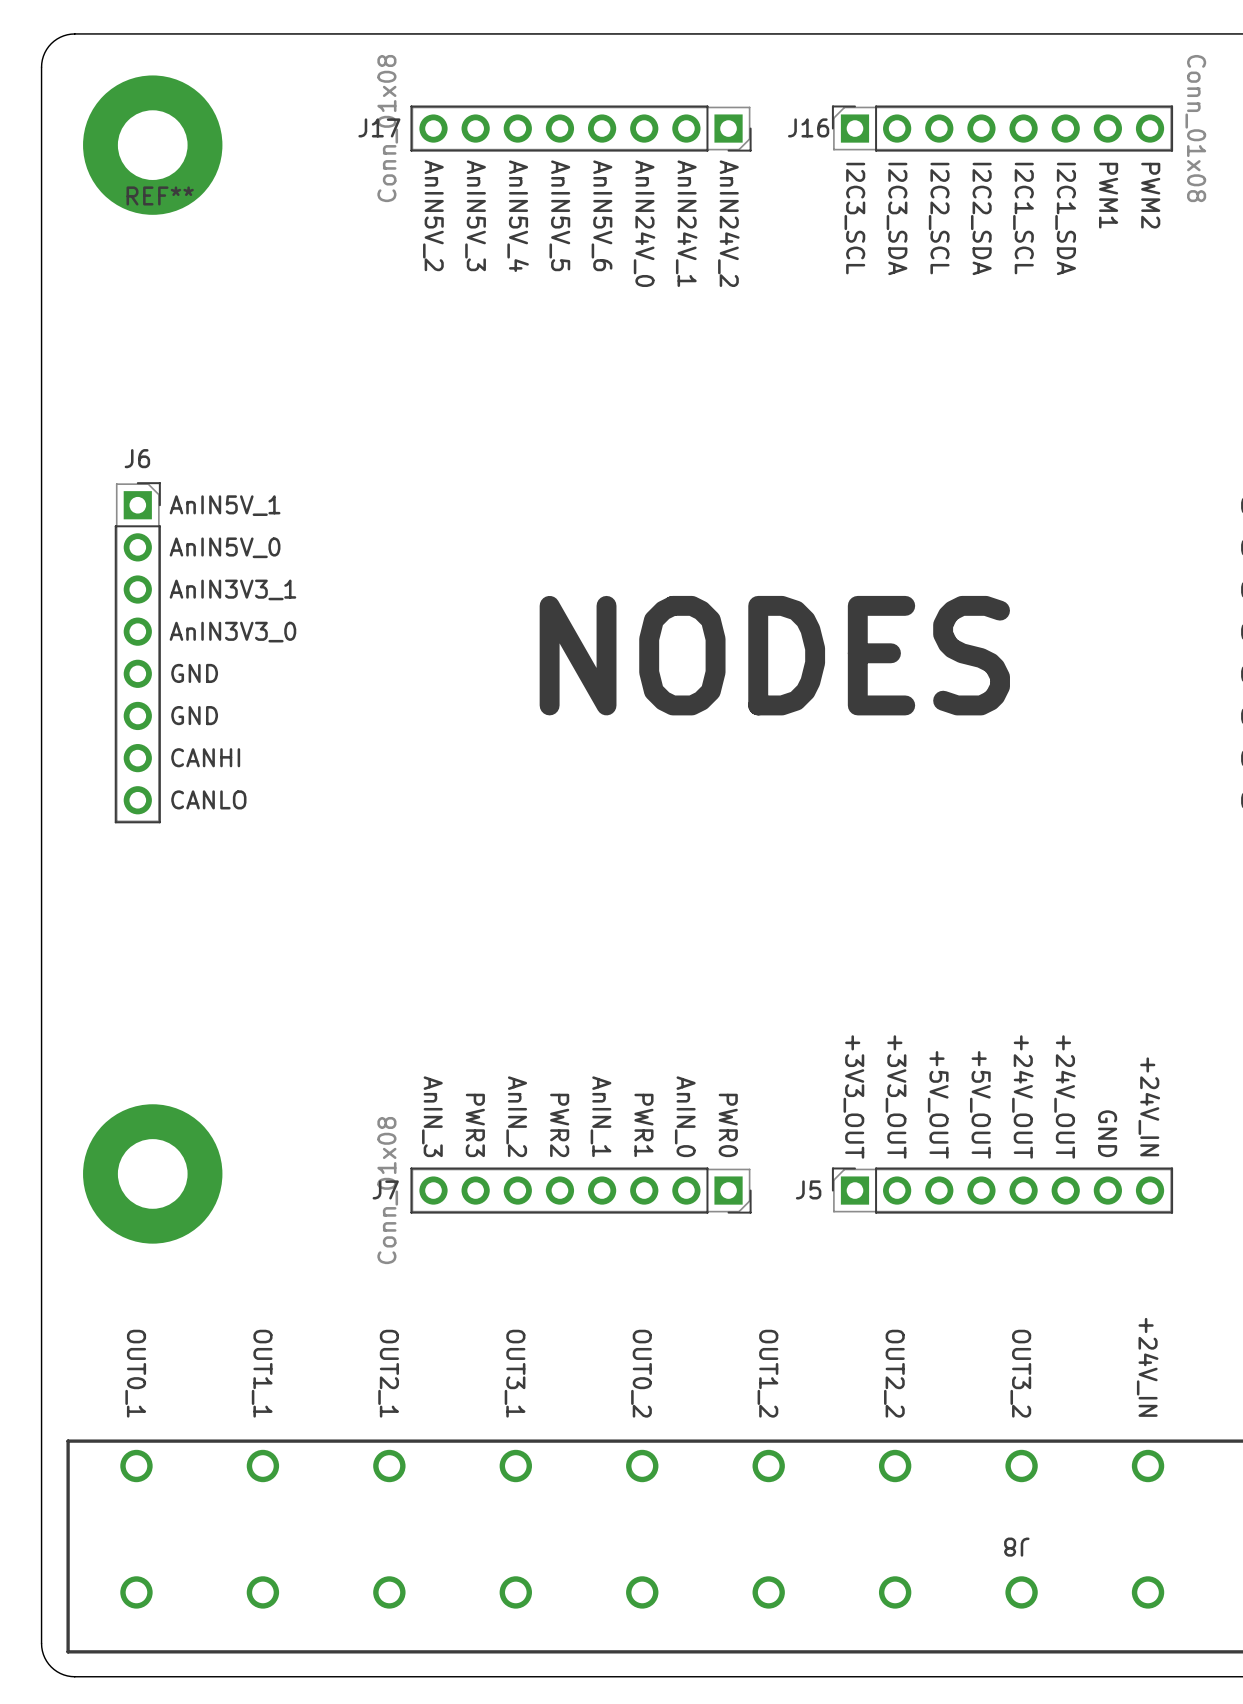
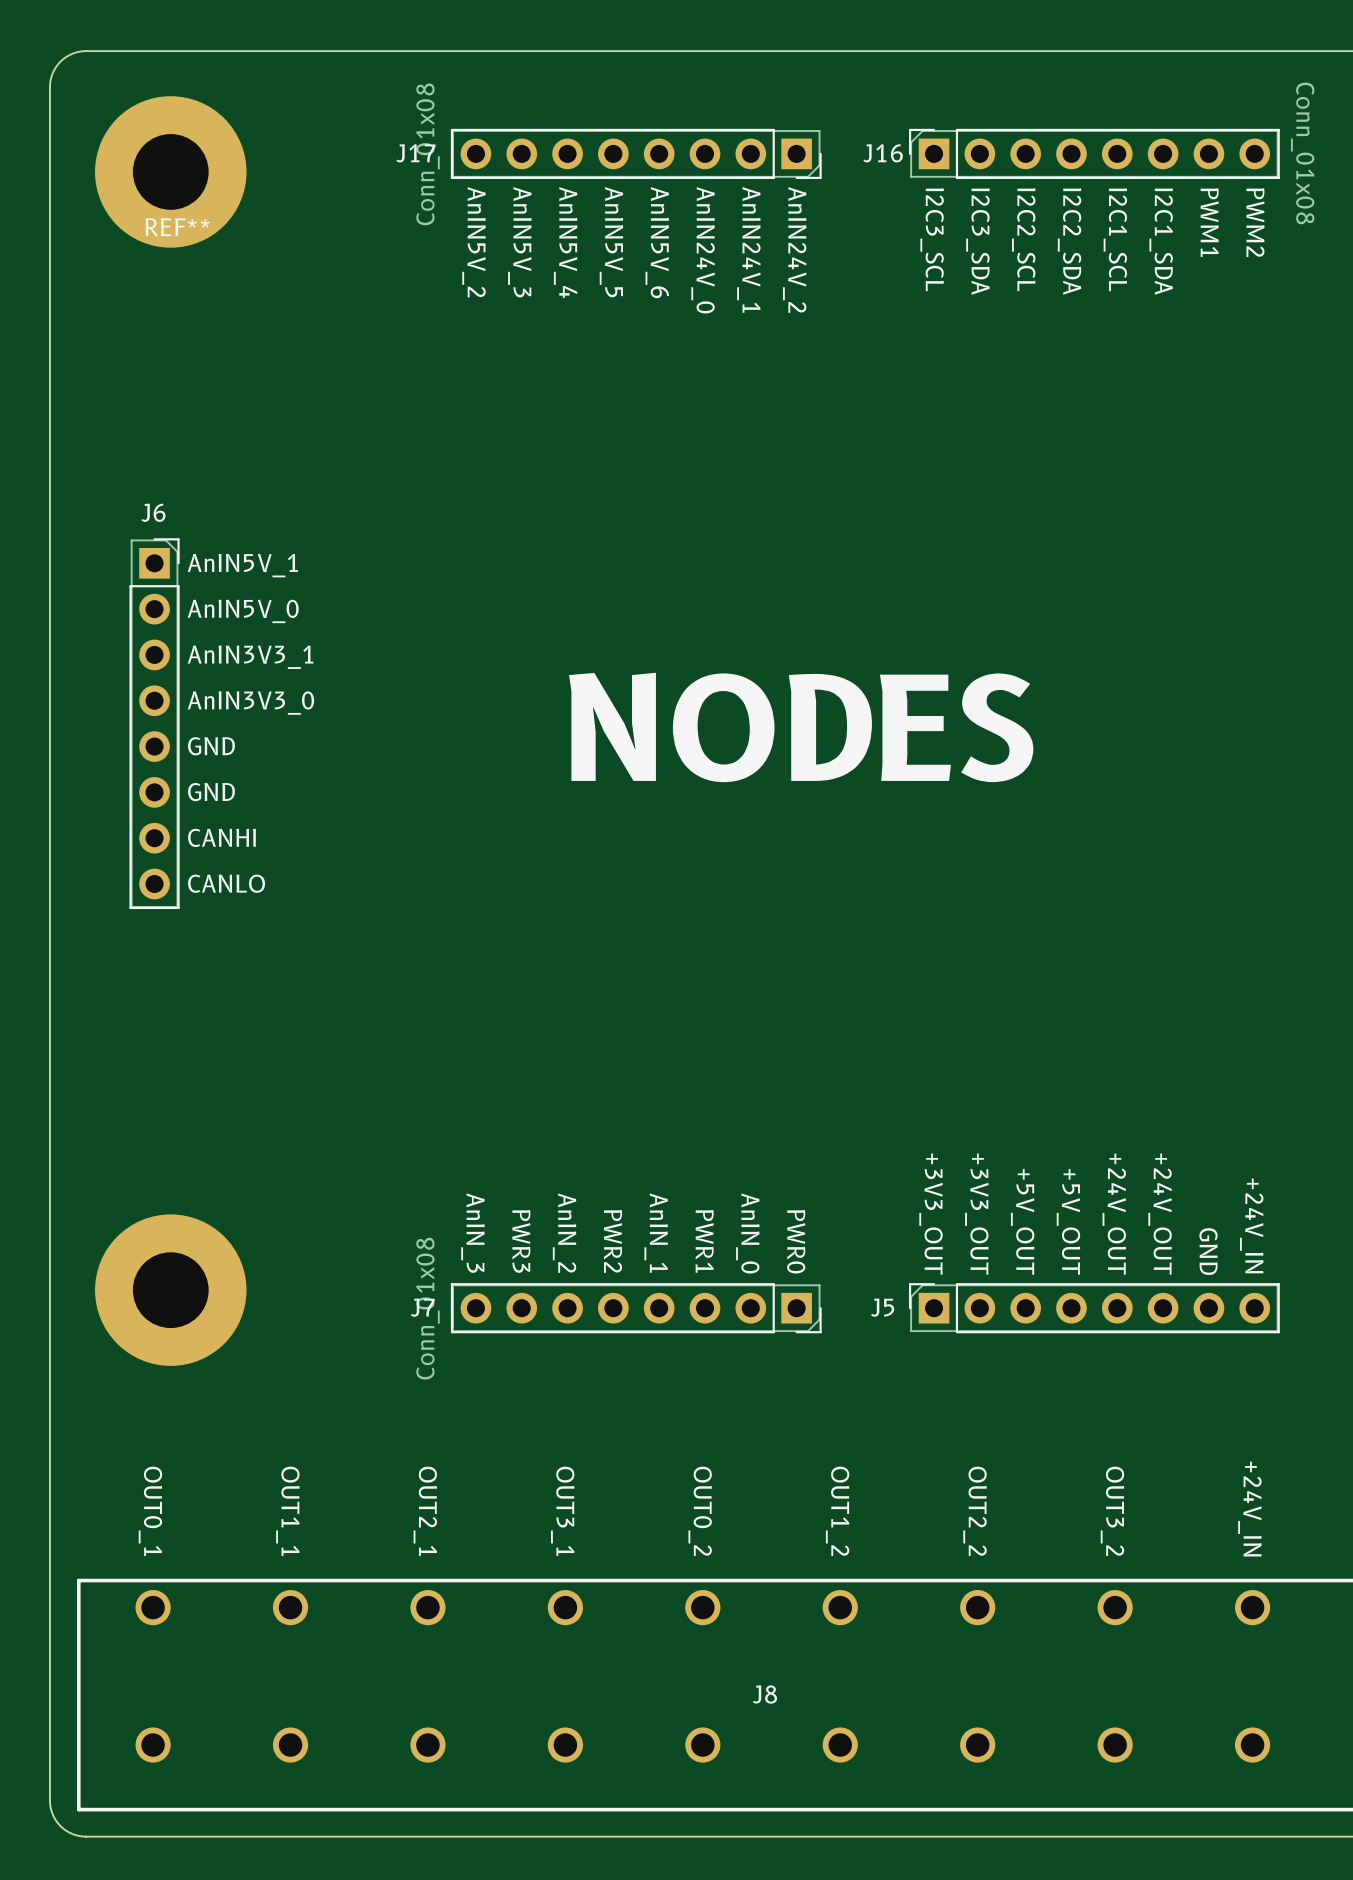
J8 name rotation: 0° (1016, 1547) -> 180° (764, 1694)
J8 name position: J8 (1016, 1547) -> J8 (764, 1694)

